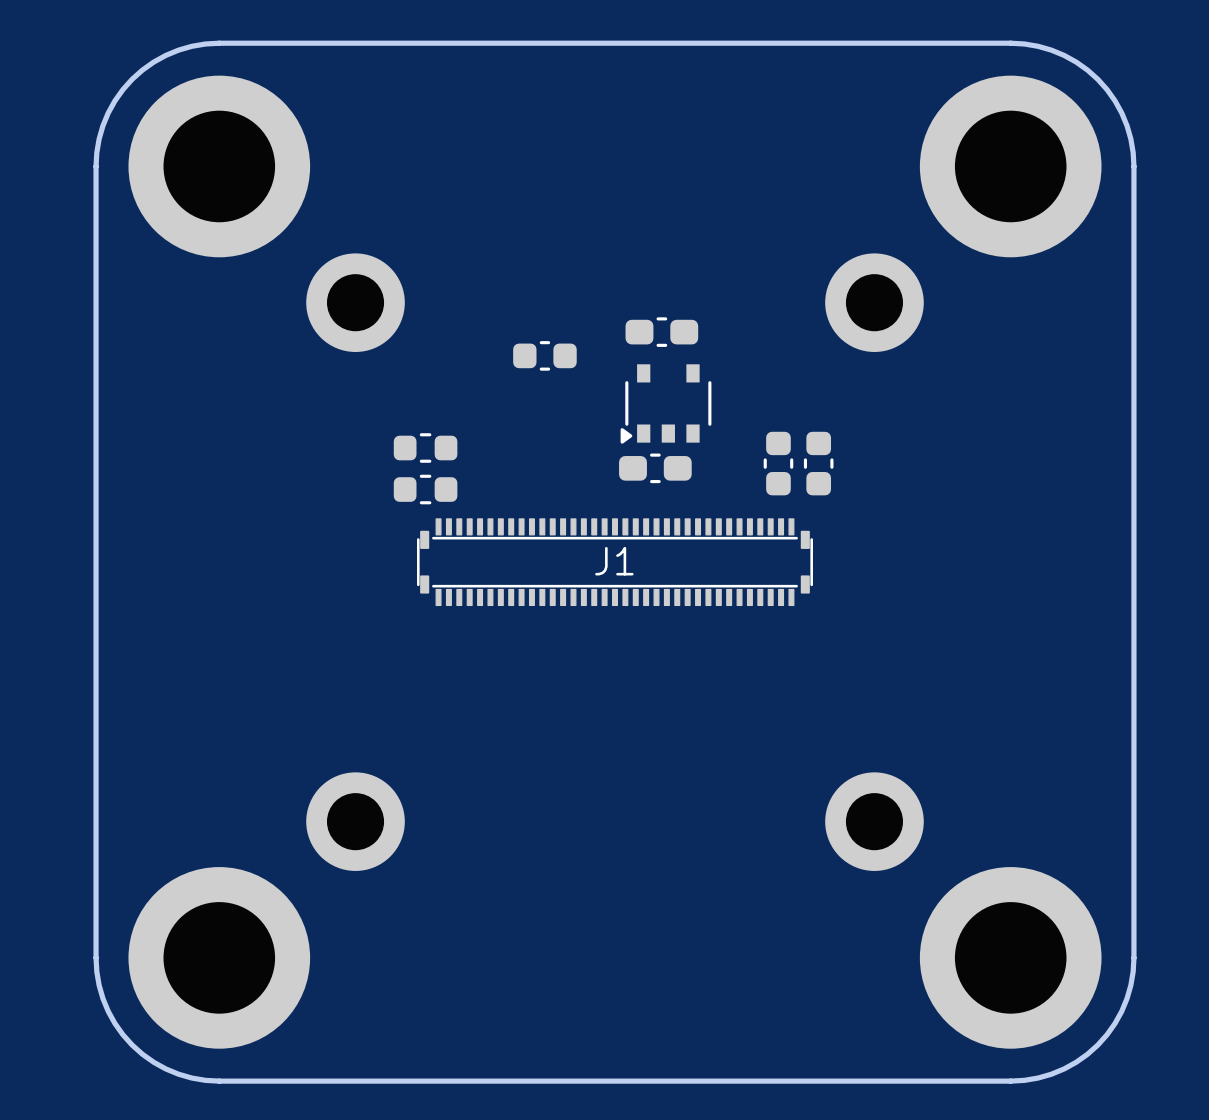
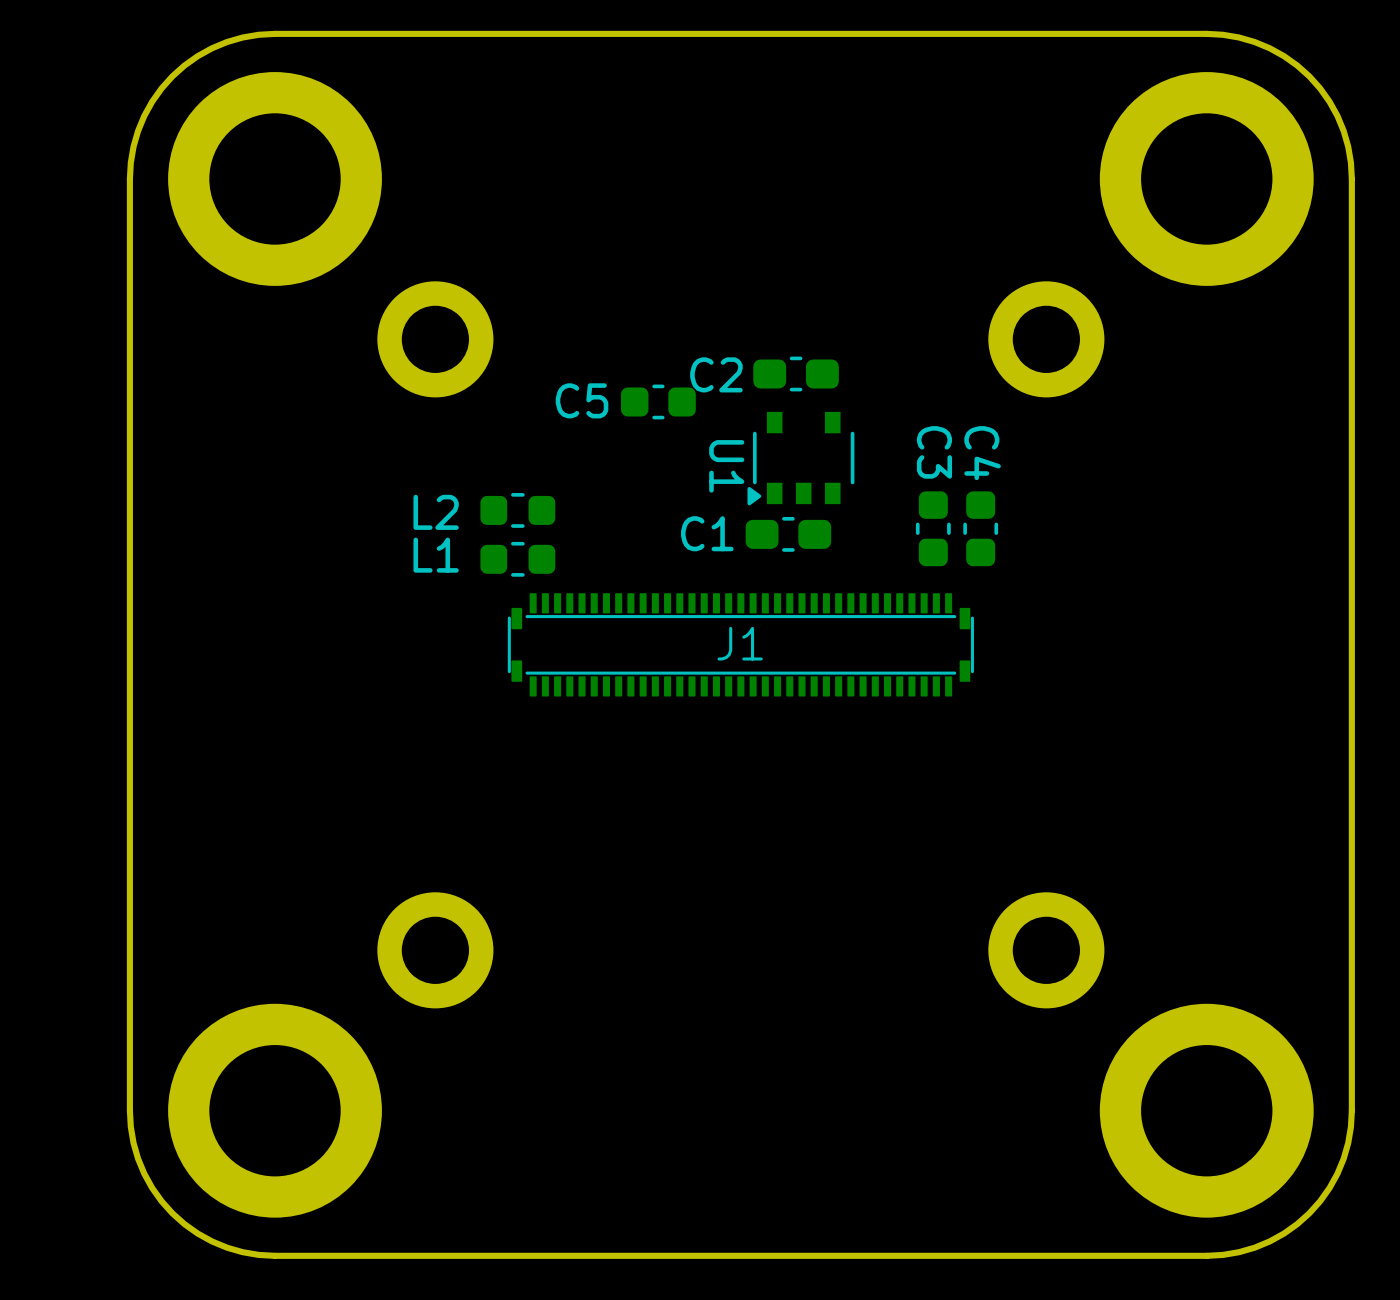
C2 name: none -> C2 (716, 374)
C5 name: none -> C5 (582, 400)
C3 name: none -> C3 (934, 452)
C4 name: none -> C4 (982, 453)
U1 name: none -> U1 (726, 466)
L2 name: none -> L2 (436, 512)
C1 name: none -> C1 (707, 533)
L1 name: none -> L1 (436, 555)

